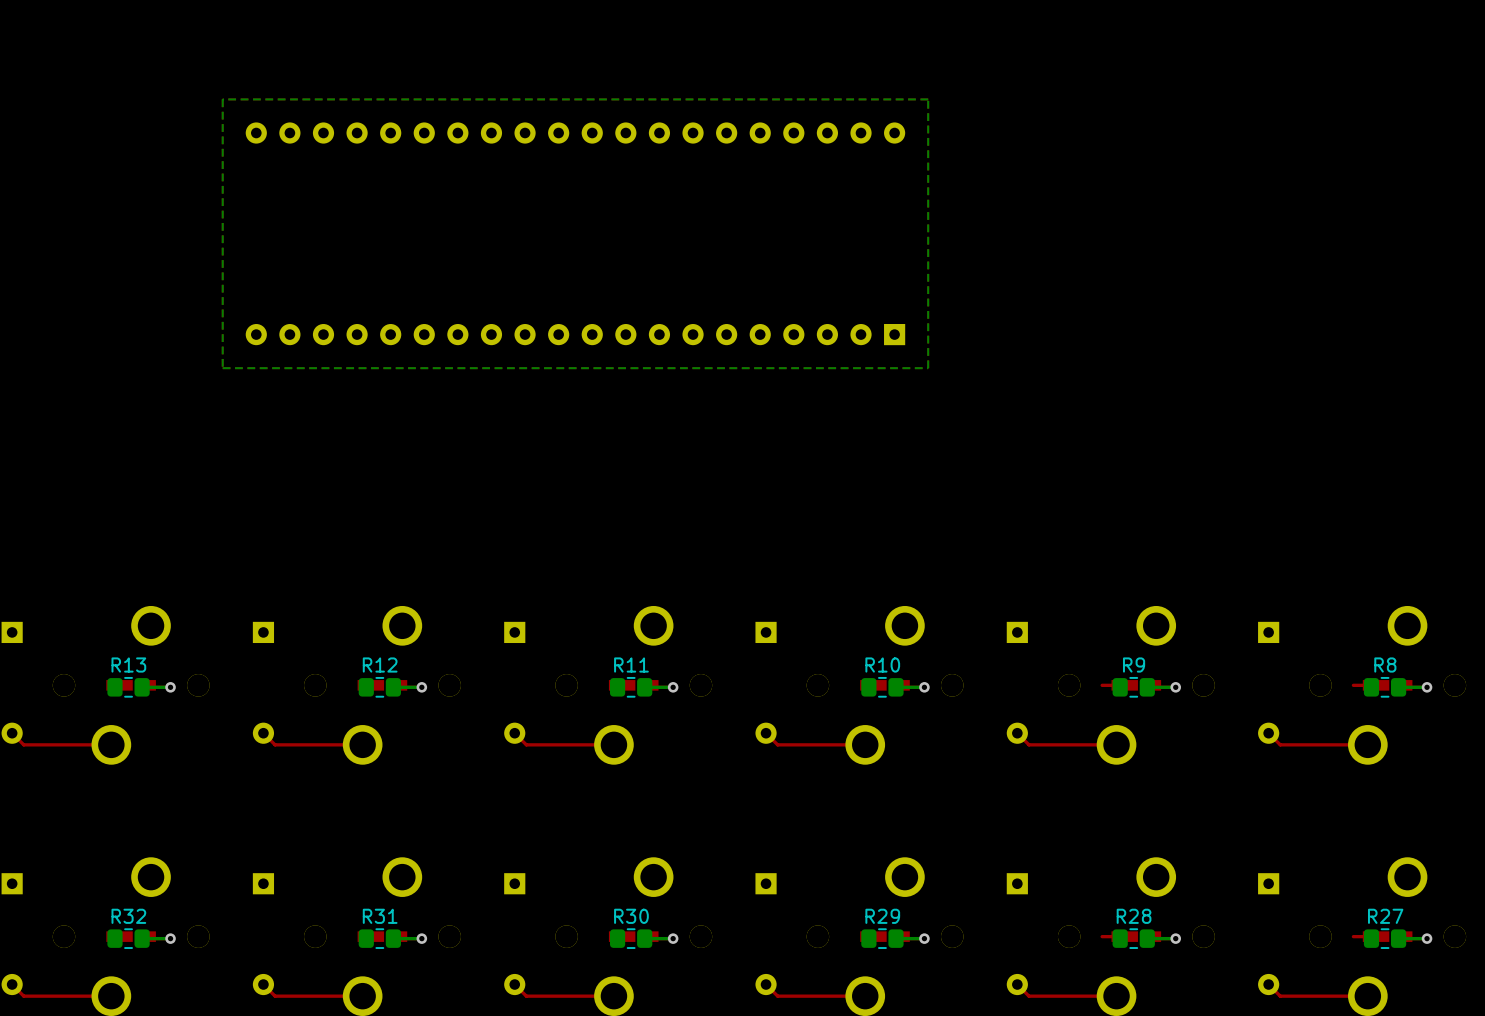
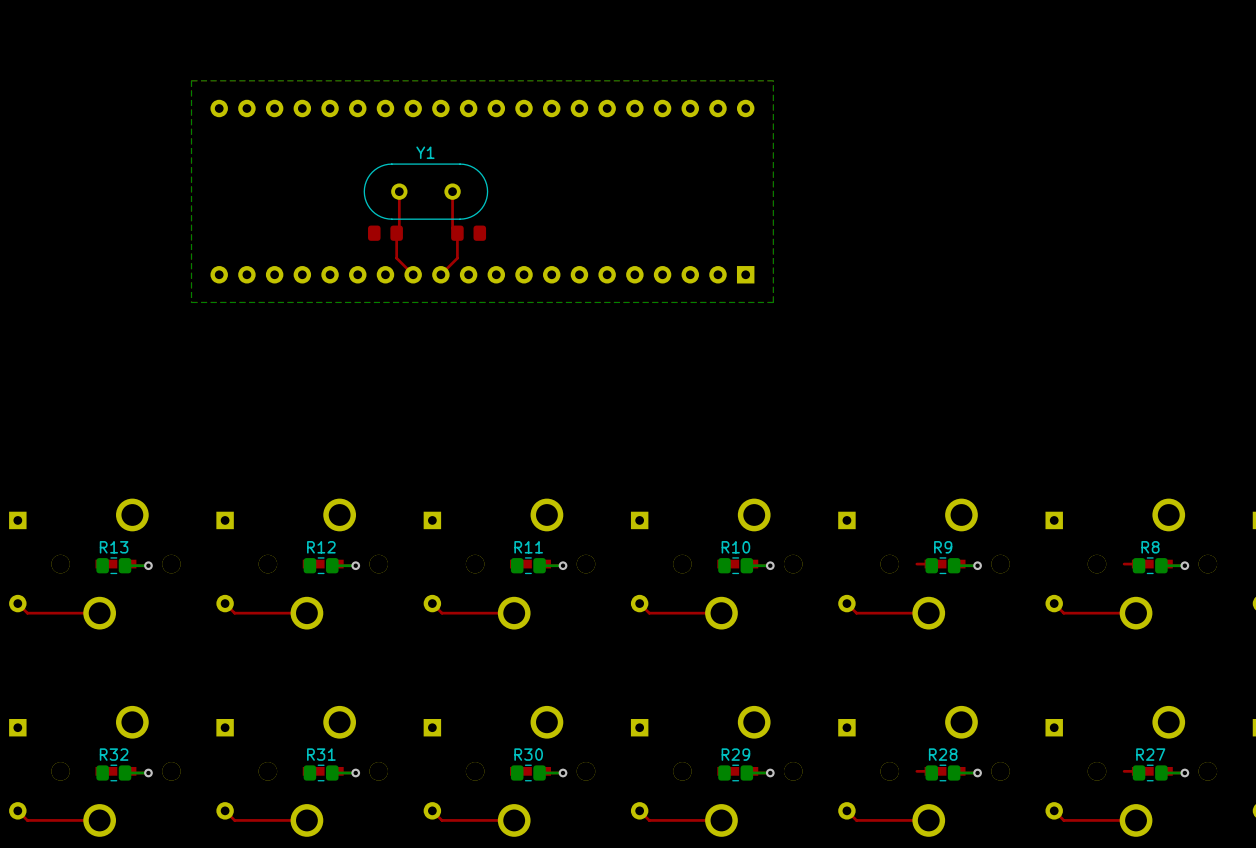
top track: none -> (399, 191) (399, 230) (396, 233) (396, 258) (413, 274)
Y1: none -> (425, 191)
top track: none -> (452, 191) (452, 228) (457, 233) (457, 258) (440, 274)
part: none -> (385, 233)
part: none -> (468, 233)

